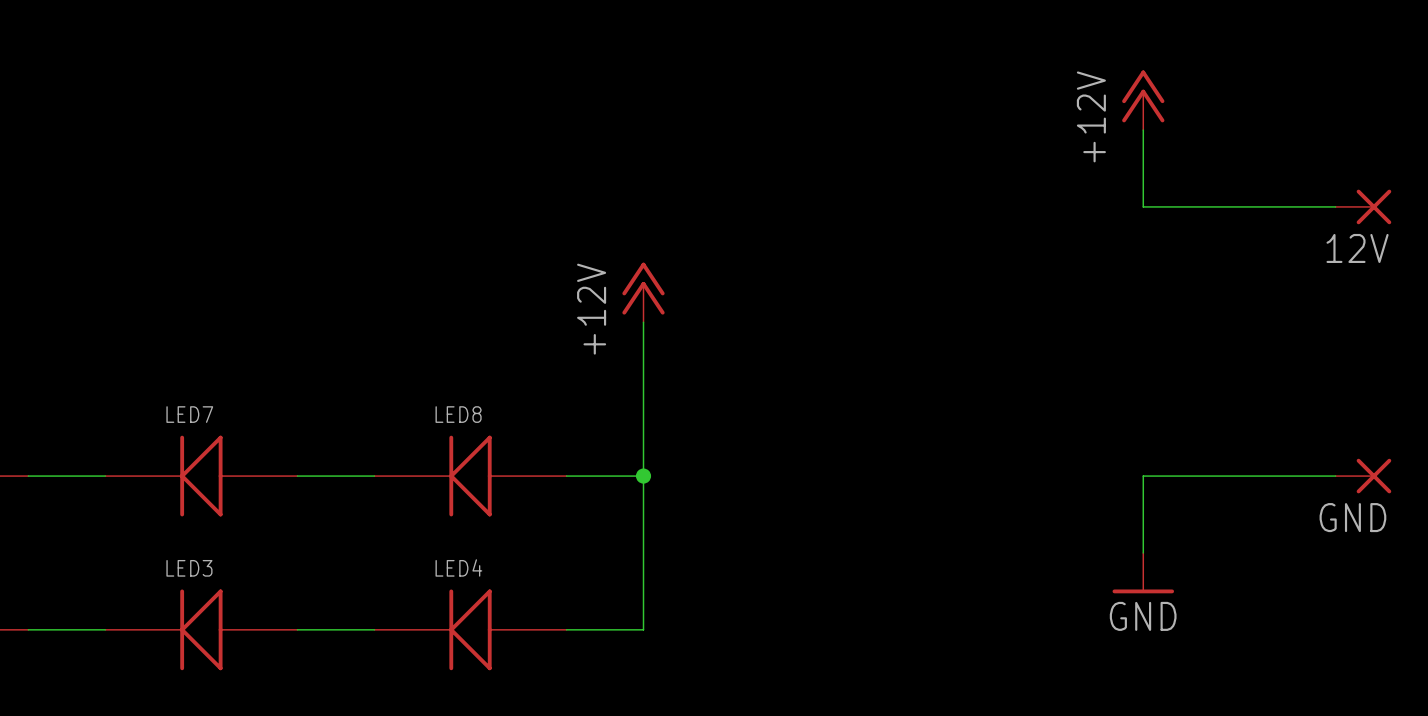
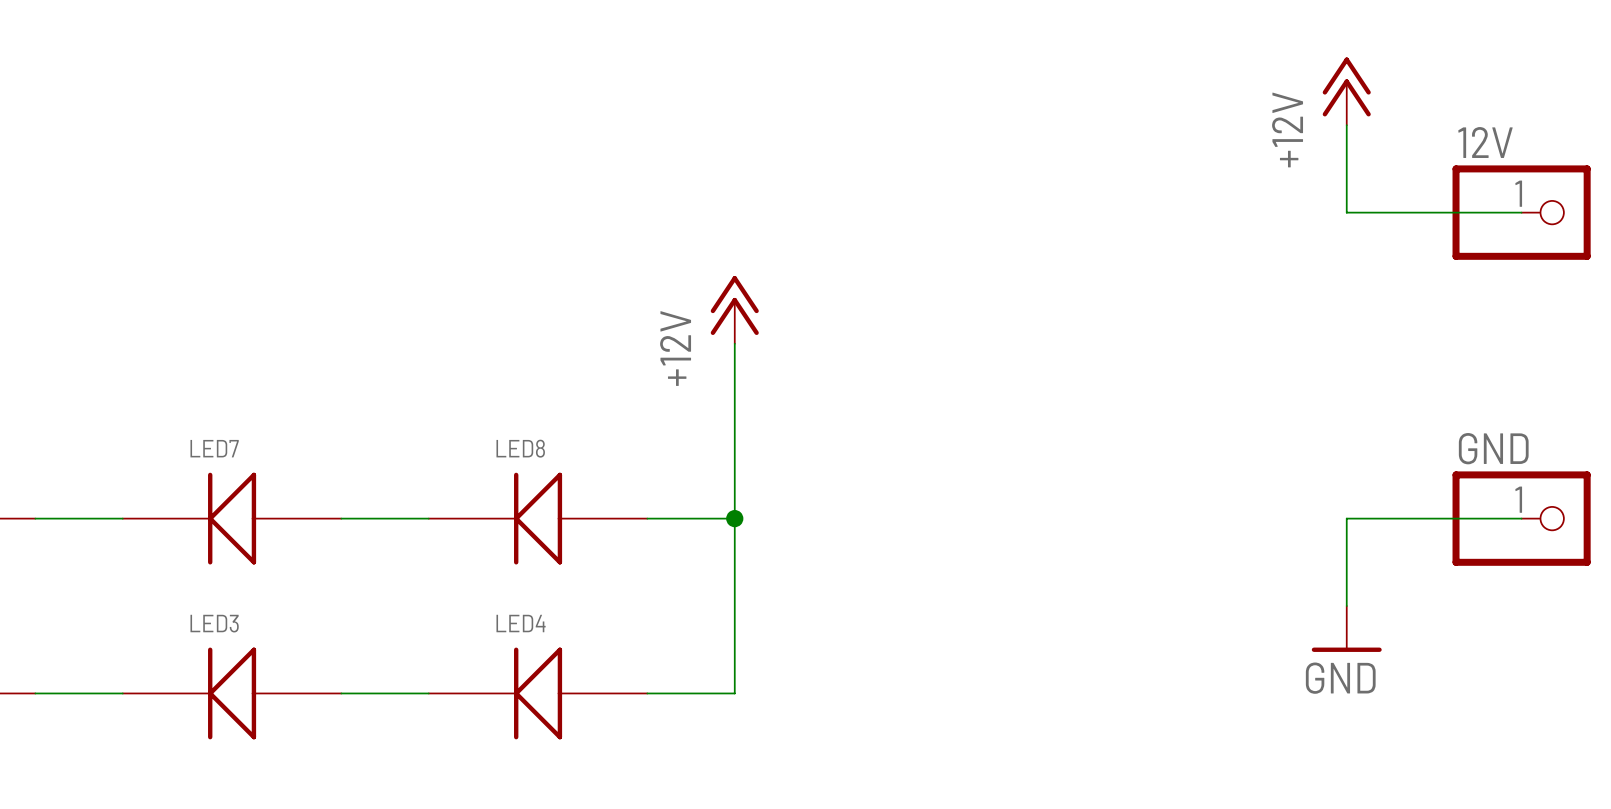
power symbol position: +12V (1143, 100) -> +12V (1346, 91)
wire: (1143, 130) (1143, 206) (1181, 206) -> (1346, 125) (1346, 212)
12V symbol: [1335, 189, 1392, 225] -> [1452, 165, 1591, 260]
12V name position: 12V (1357, 248) -> 12V (1485, 142)
wire: (1181, 476) (1143, 476) (1143, 552) -> (1346, 518) (1346, 606)
GND: none -> (1521, 518)
GND: (1363, 476) -> none
power symbol position: GND (1143, 573) -> GND (1346, 628)

